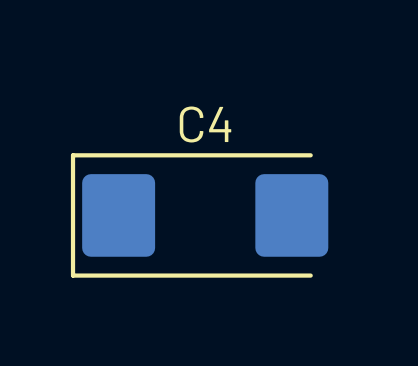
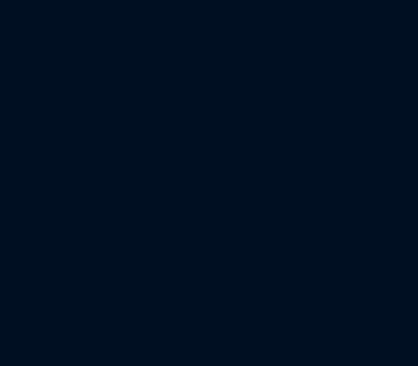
C4: (199, 215) -> none

